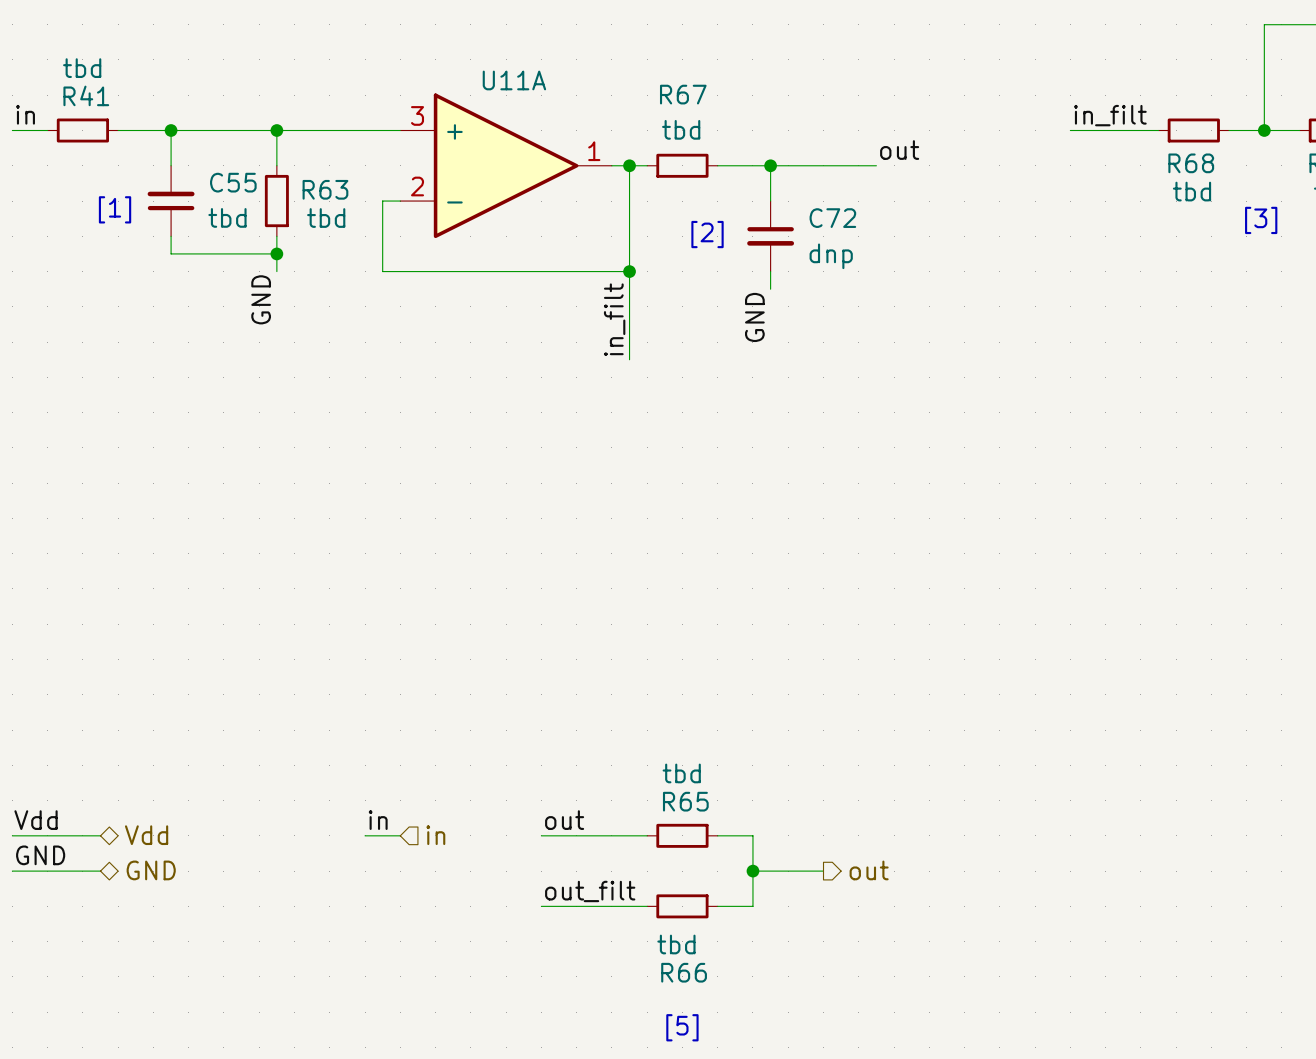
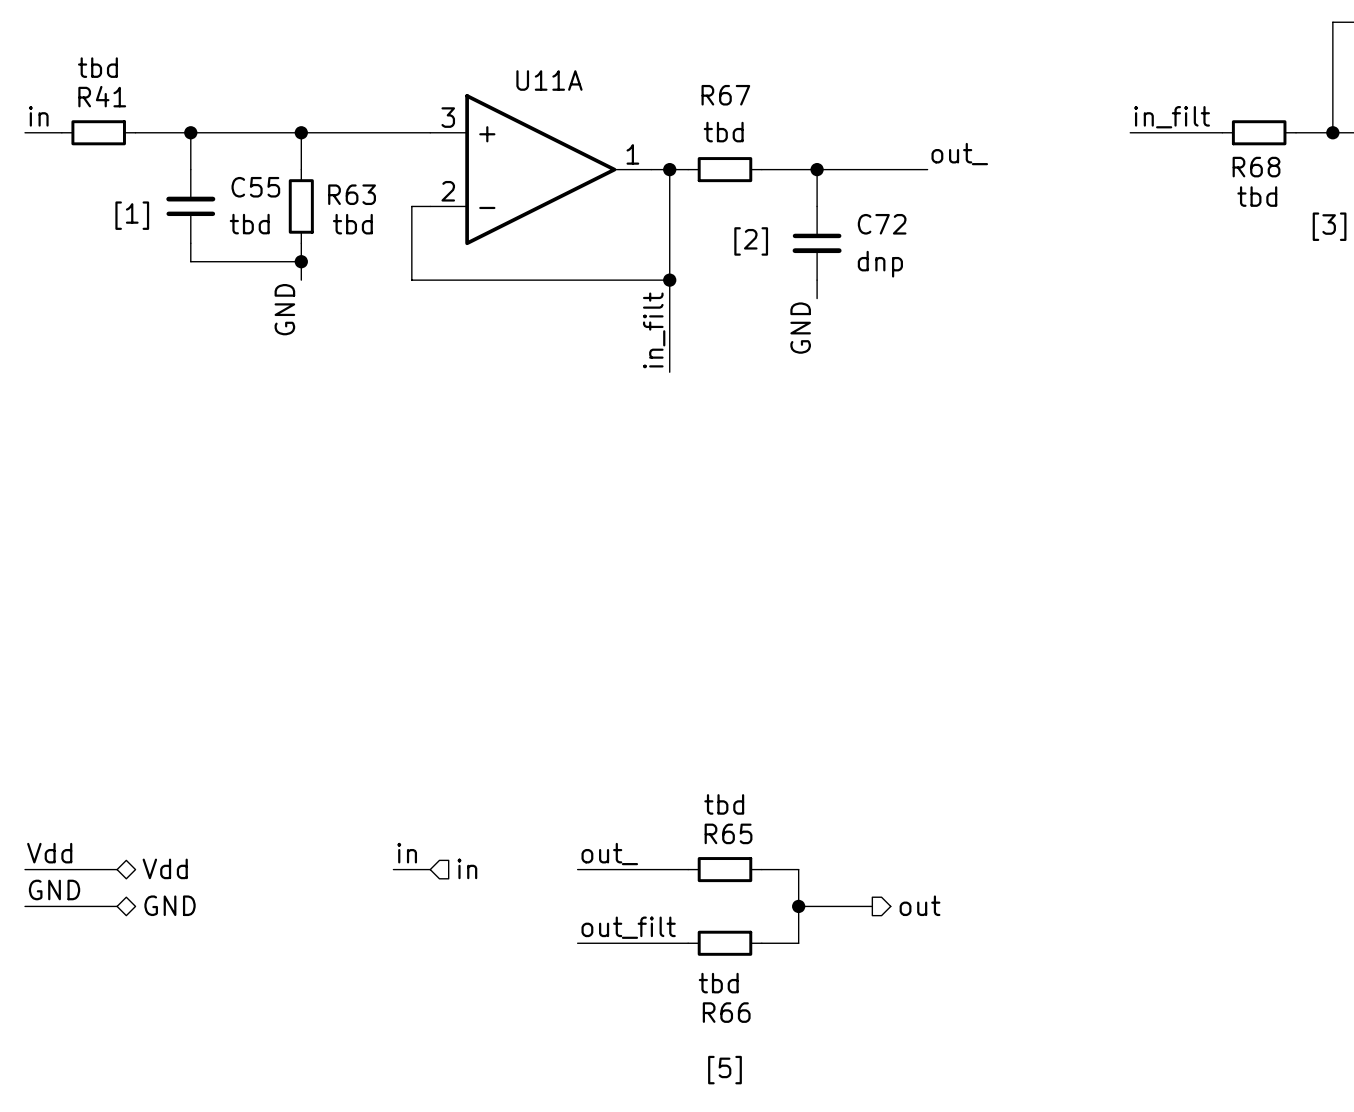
label: out (899, 150) -> out_ (959, 154)
label: out (564, 820) -> out_ (609, 854)

